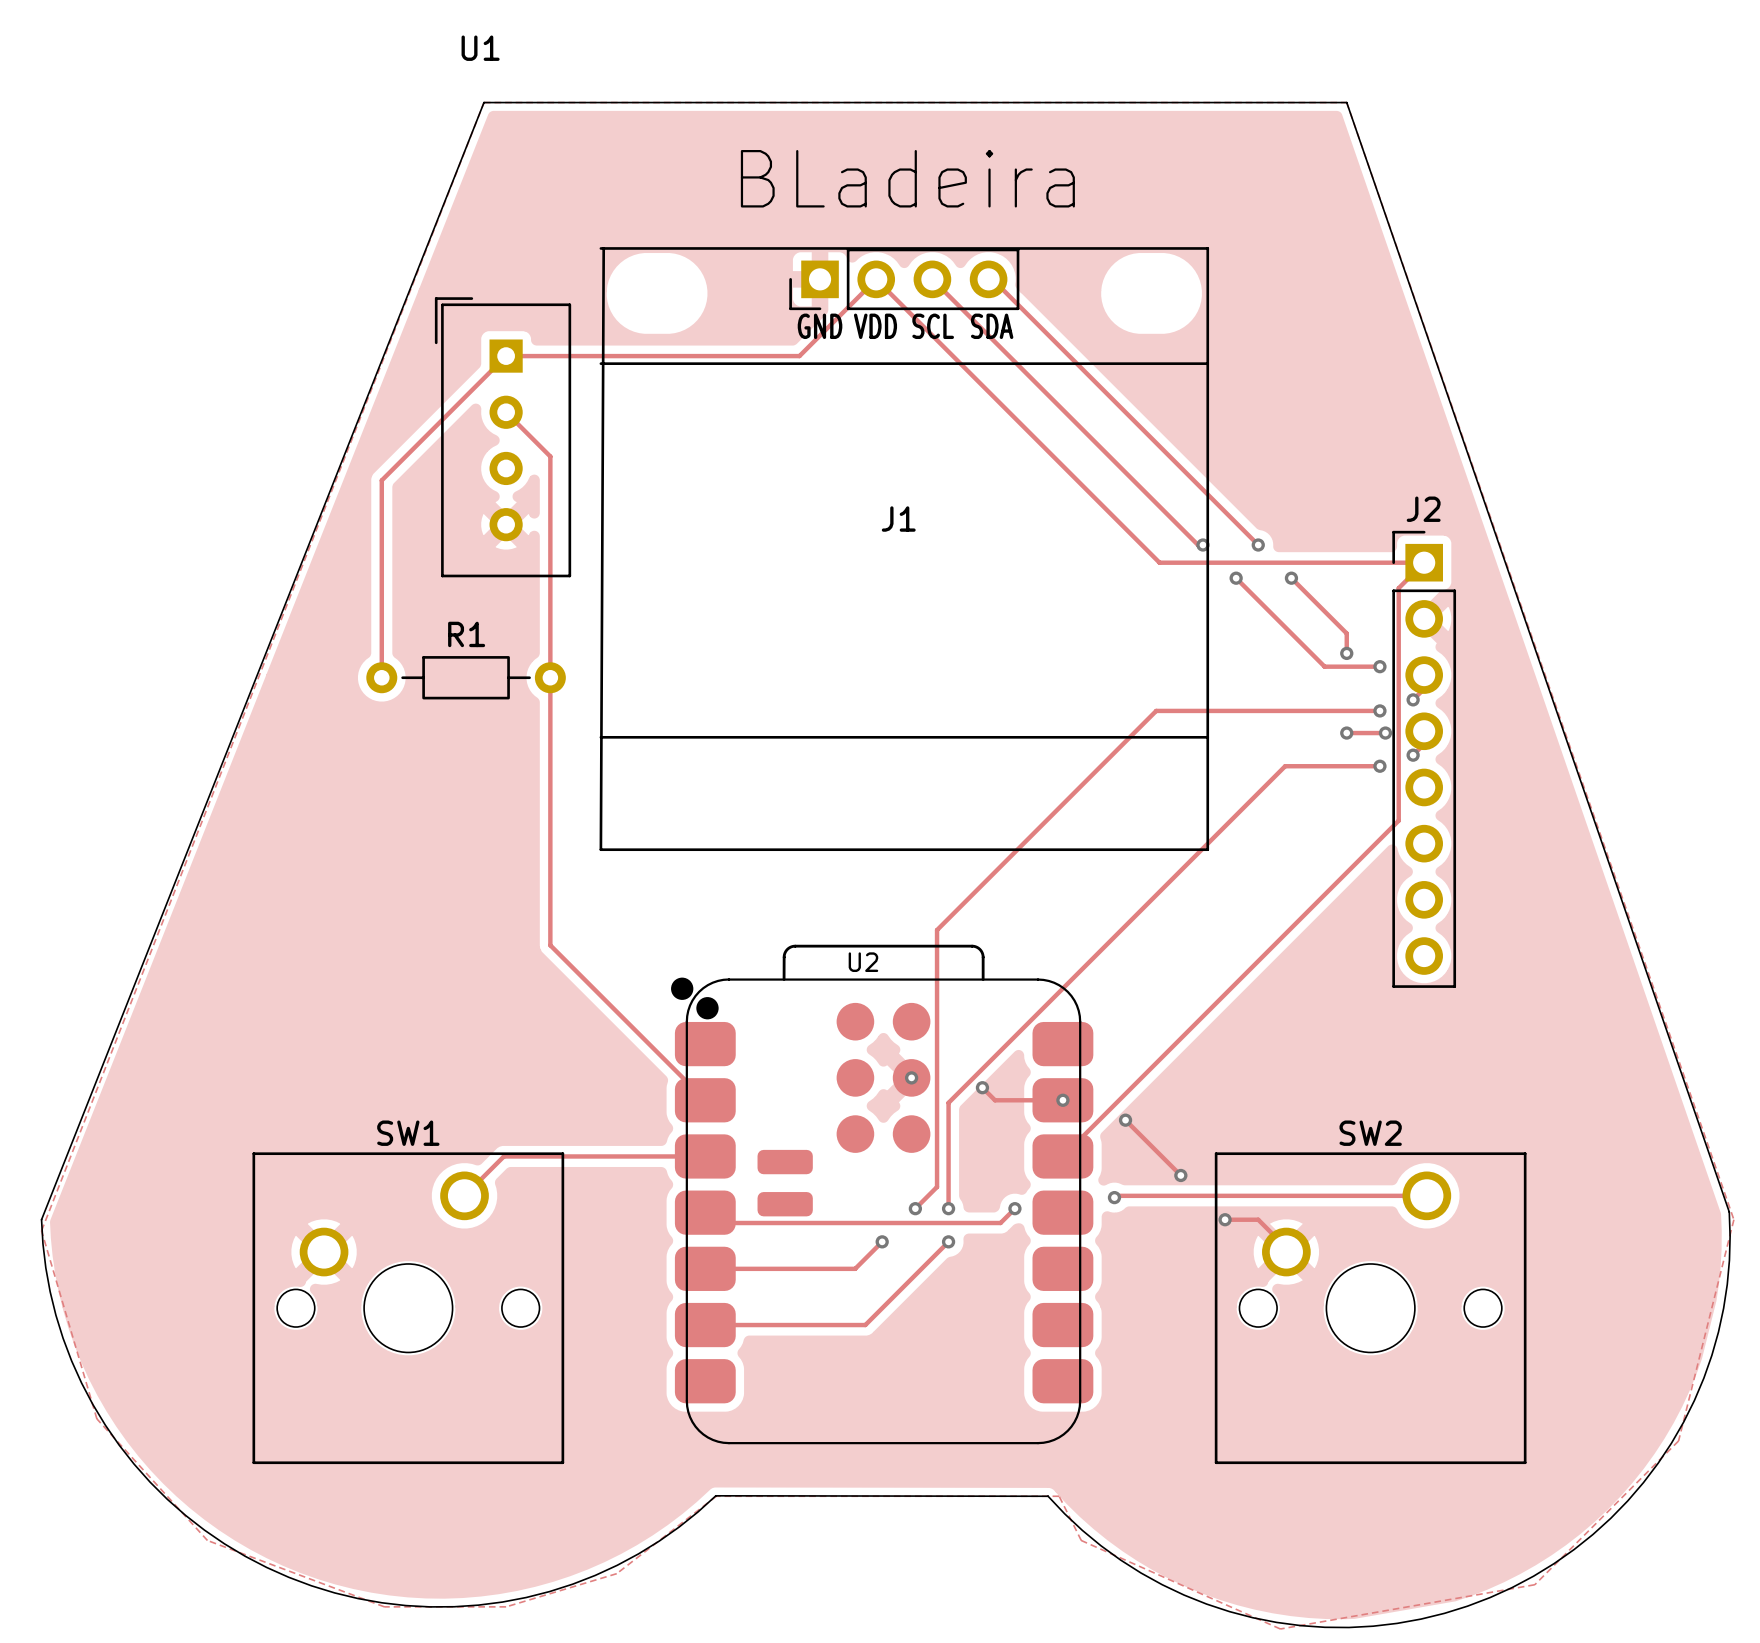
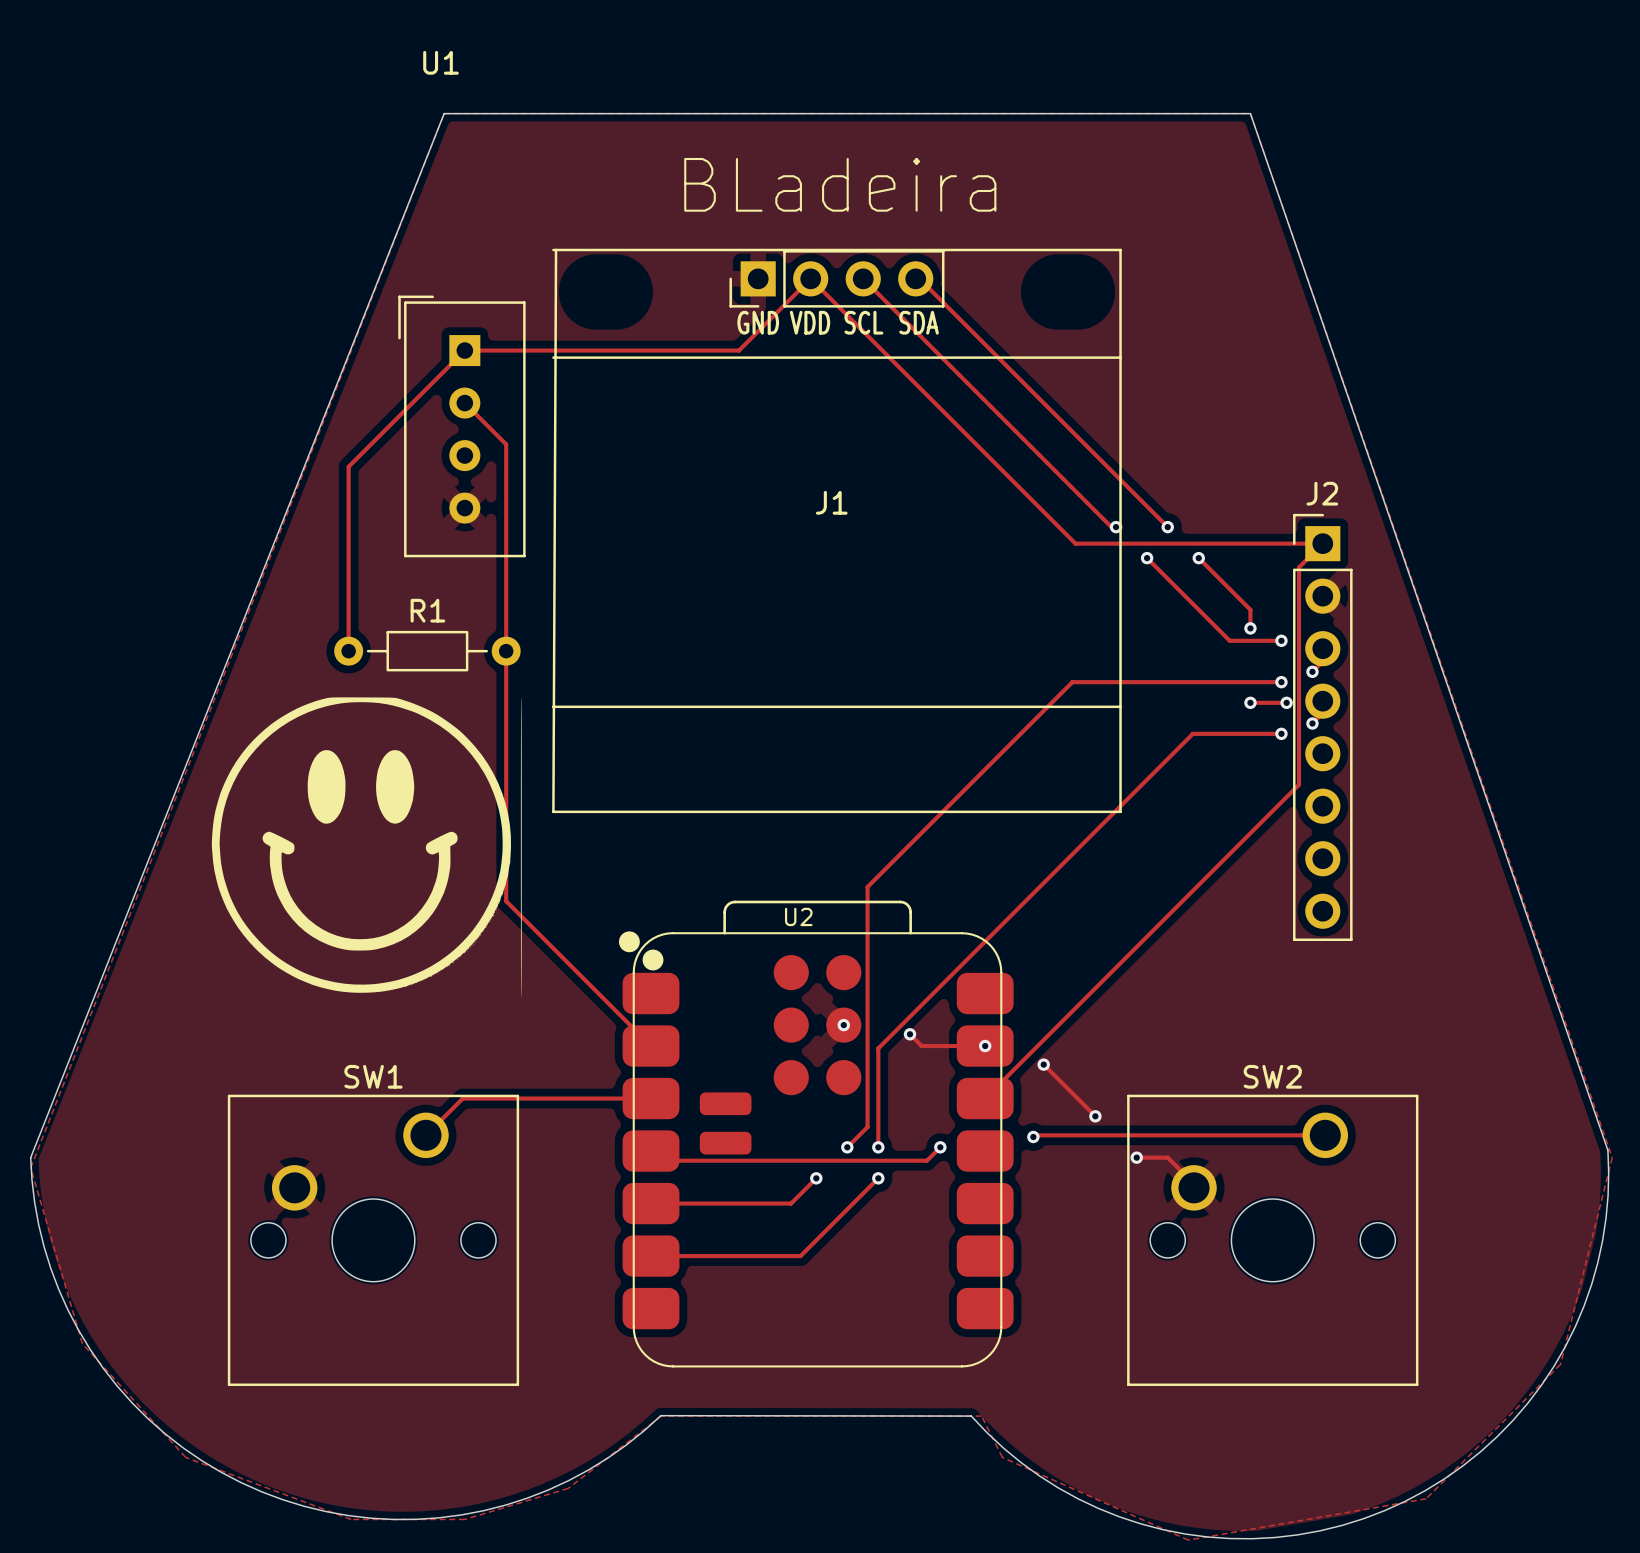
drawing: none -> [211, 697, 522, 998]

